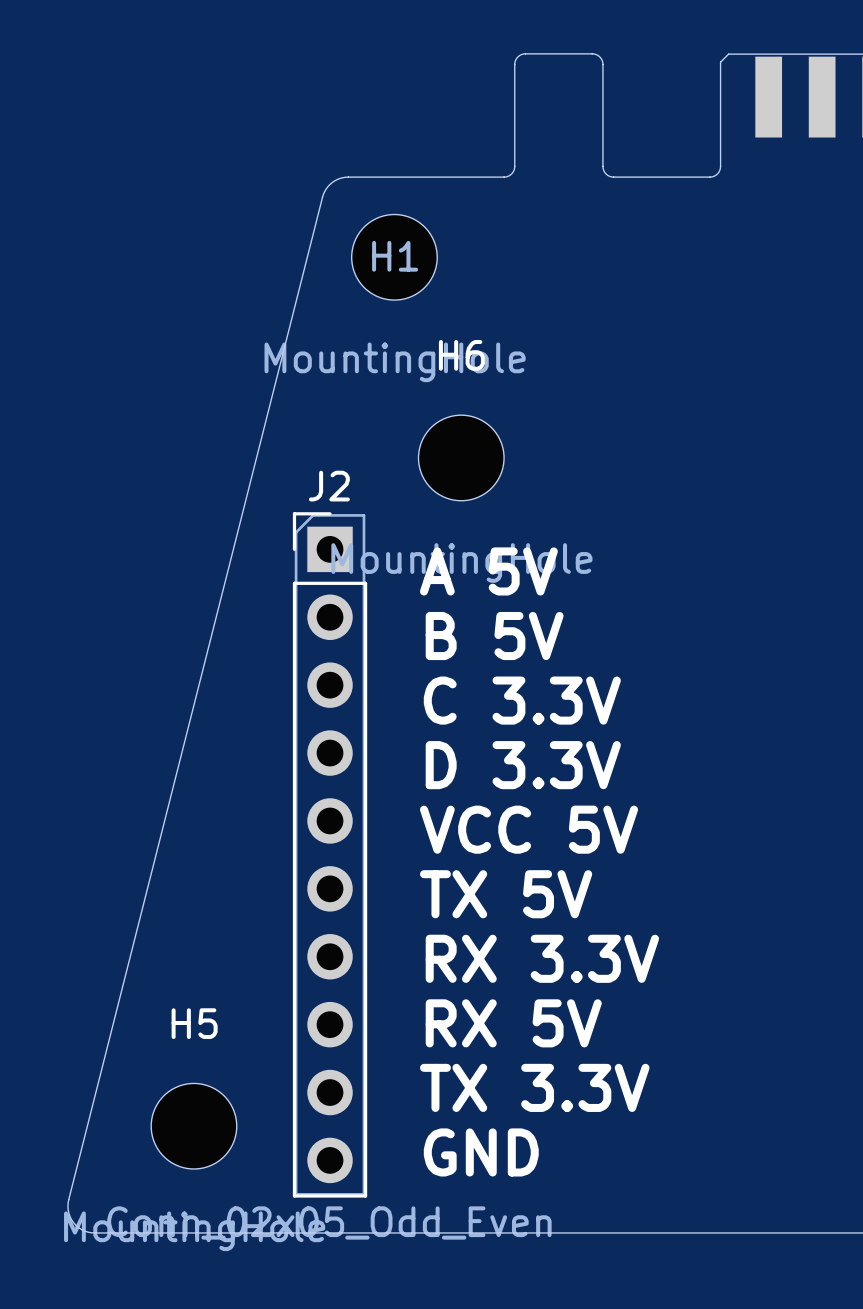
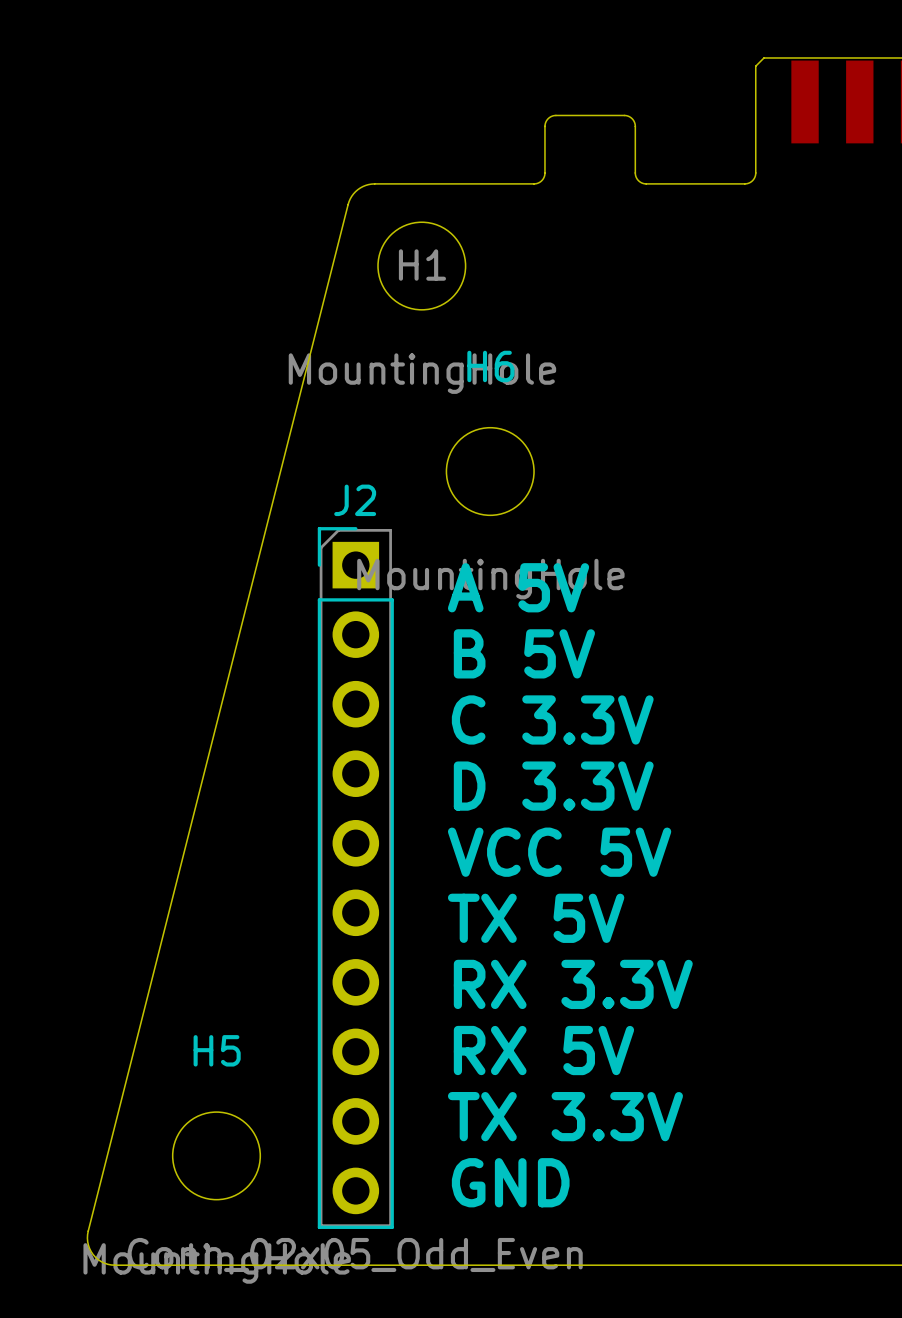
board edge: (514, 120) (514, 63) (518, 56) (525, 53) (592, 53) (598, 56) (602, 64) (602, 120) -> (544, 126) (548, 118) (555, 115) (625, 115) (632, 118) (635, 126)

